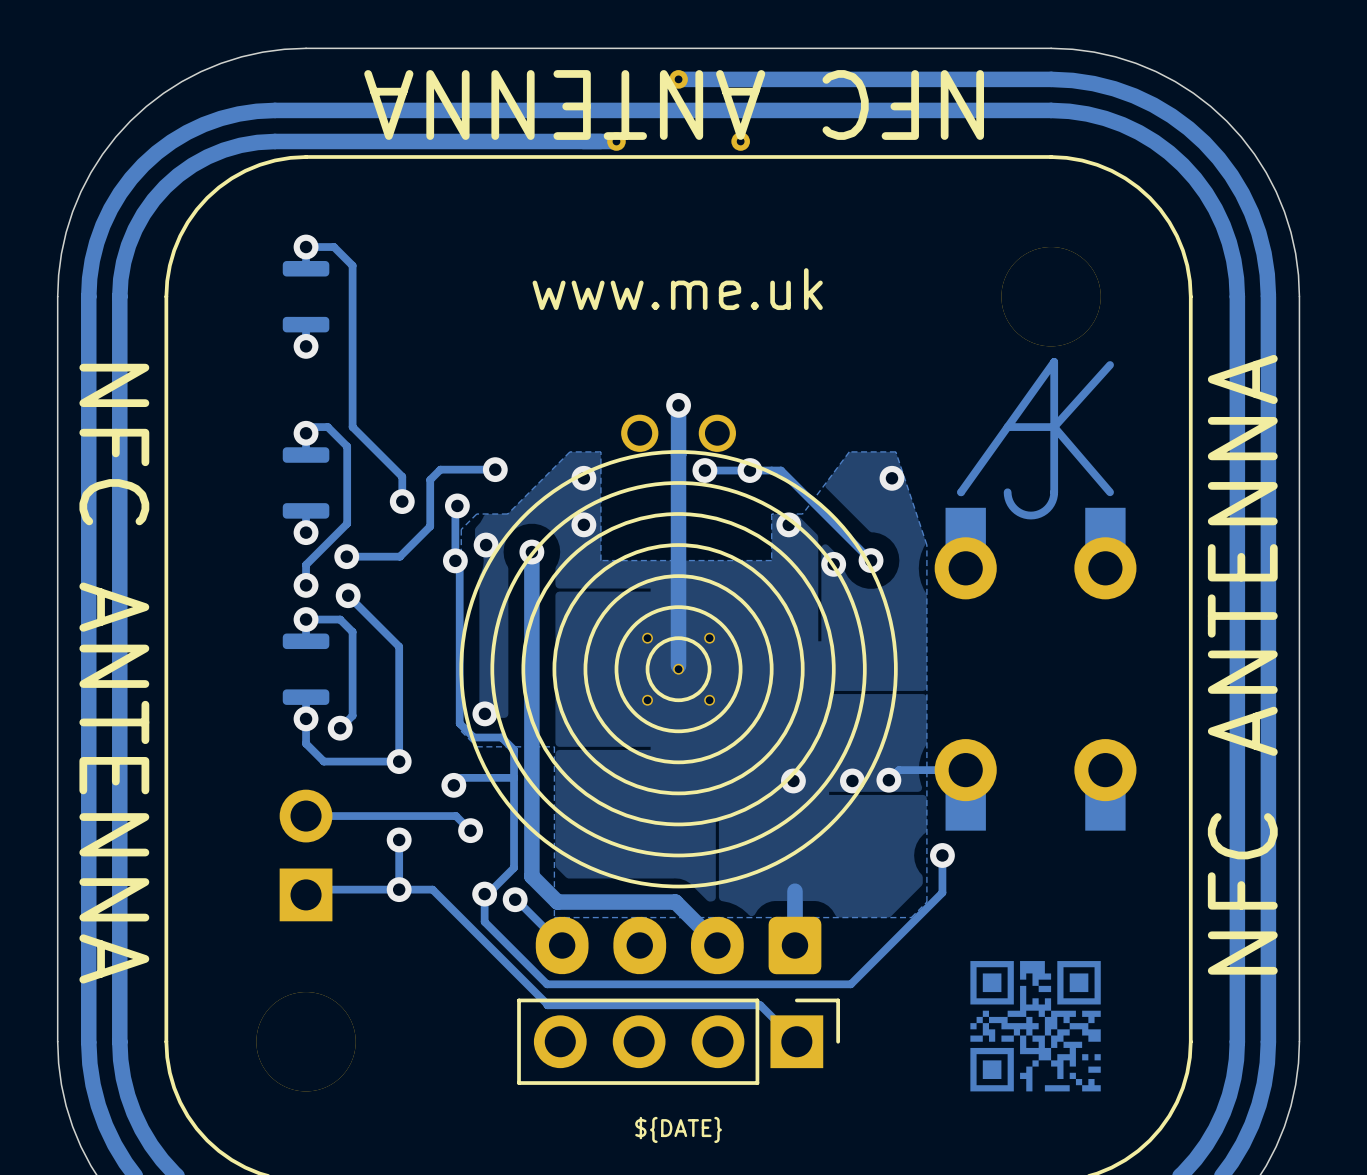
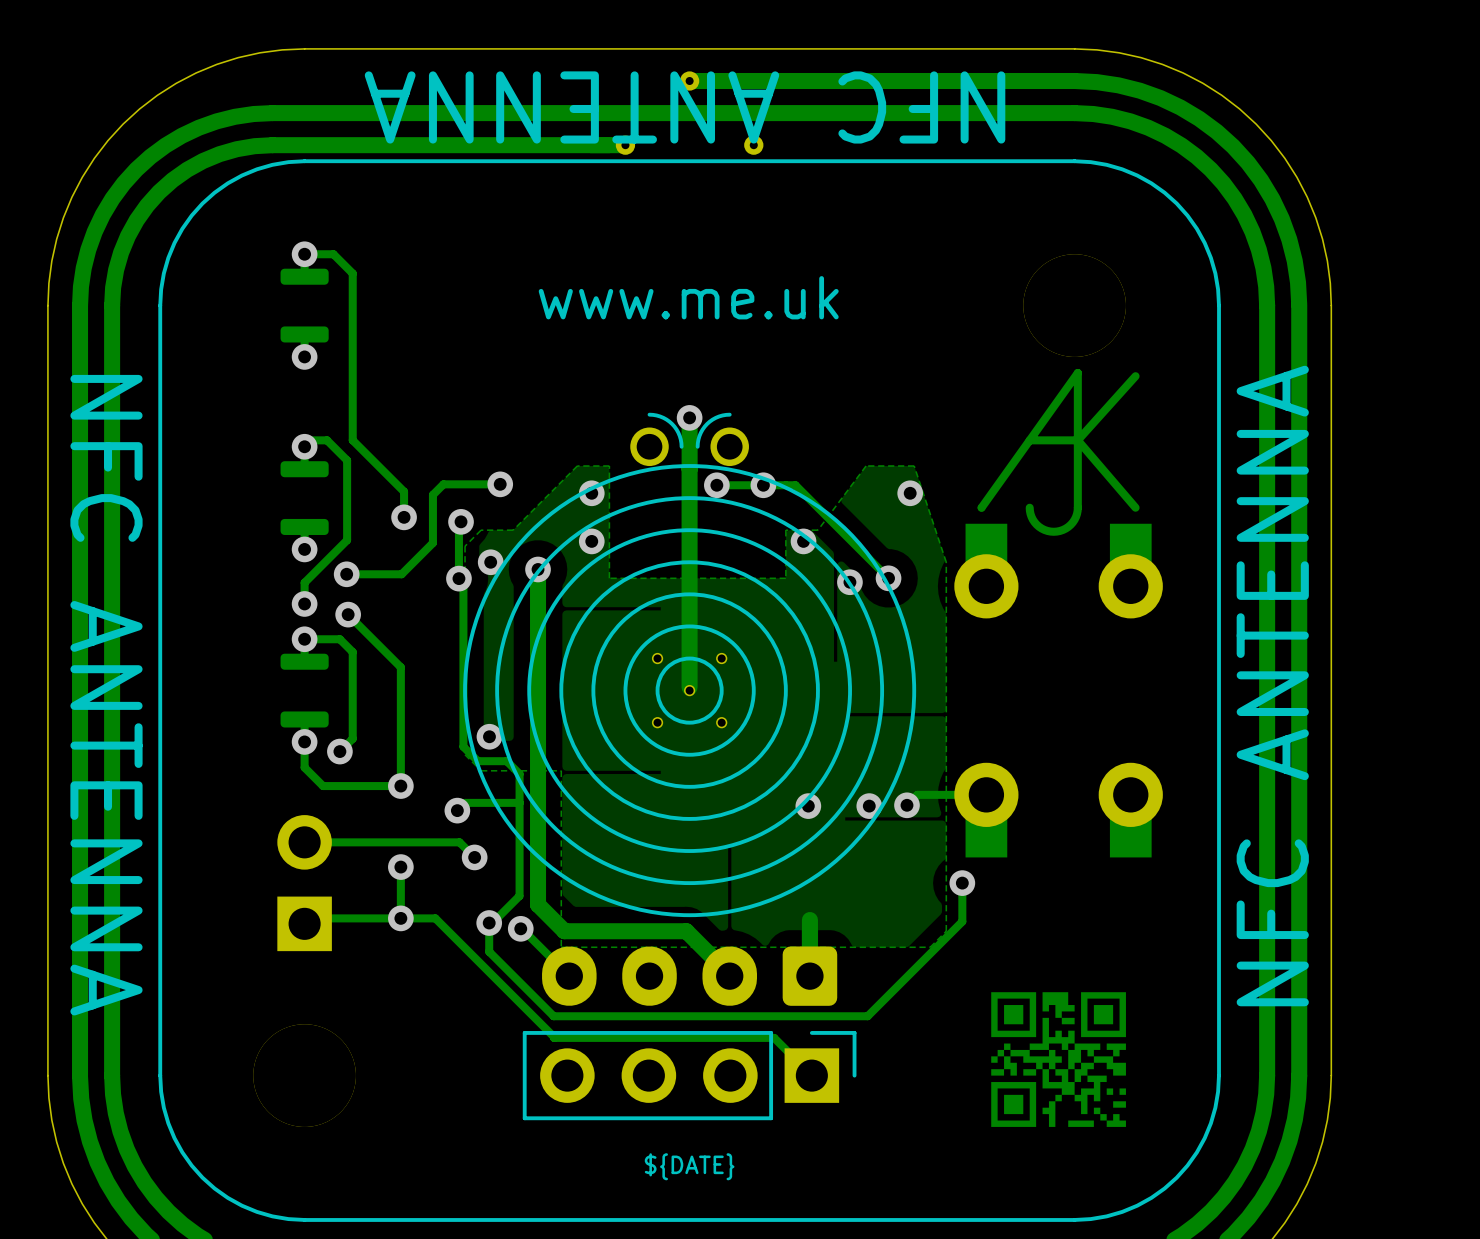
line: none -> (649, 414) (663, 417) (672, 424) (678, 432) (681, 446)
line: none -> (729, 414) (719, 416) (707, 424) (699, 436) (697, 446)

